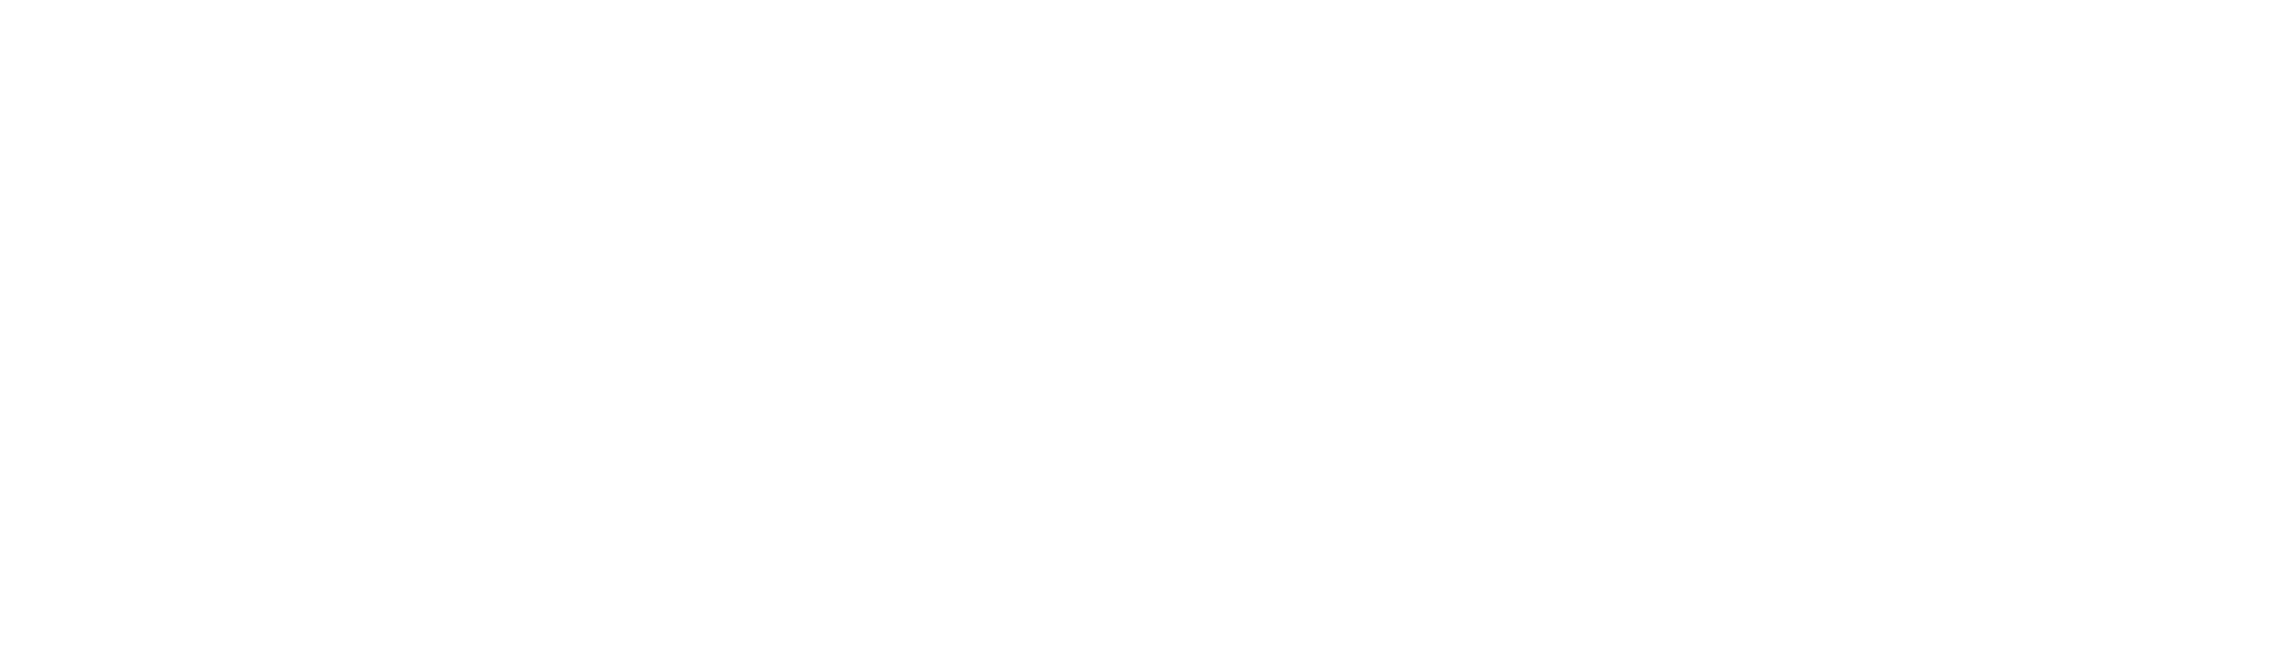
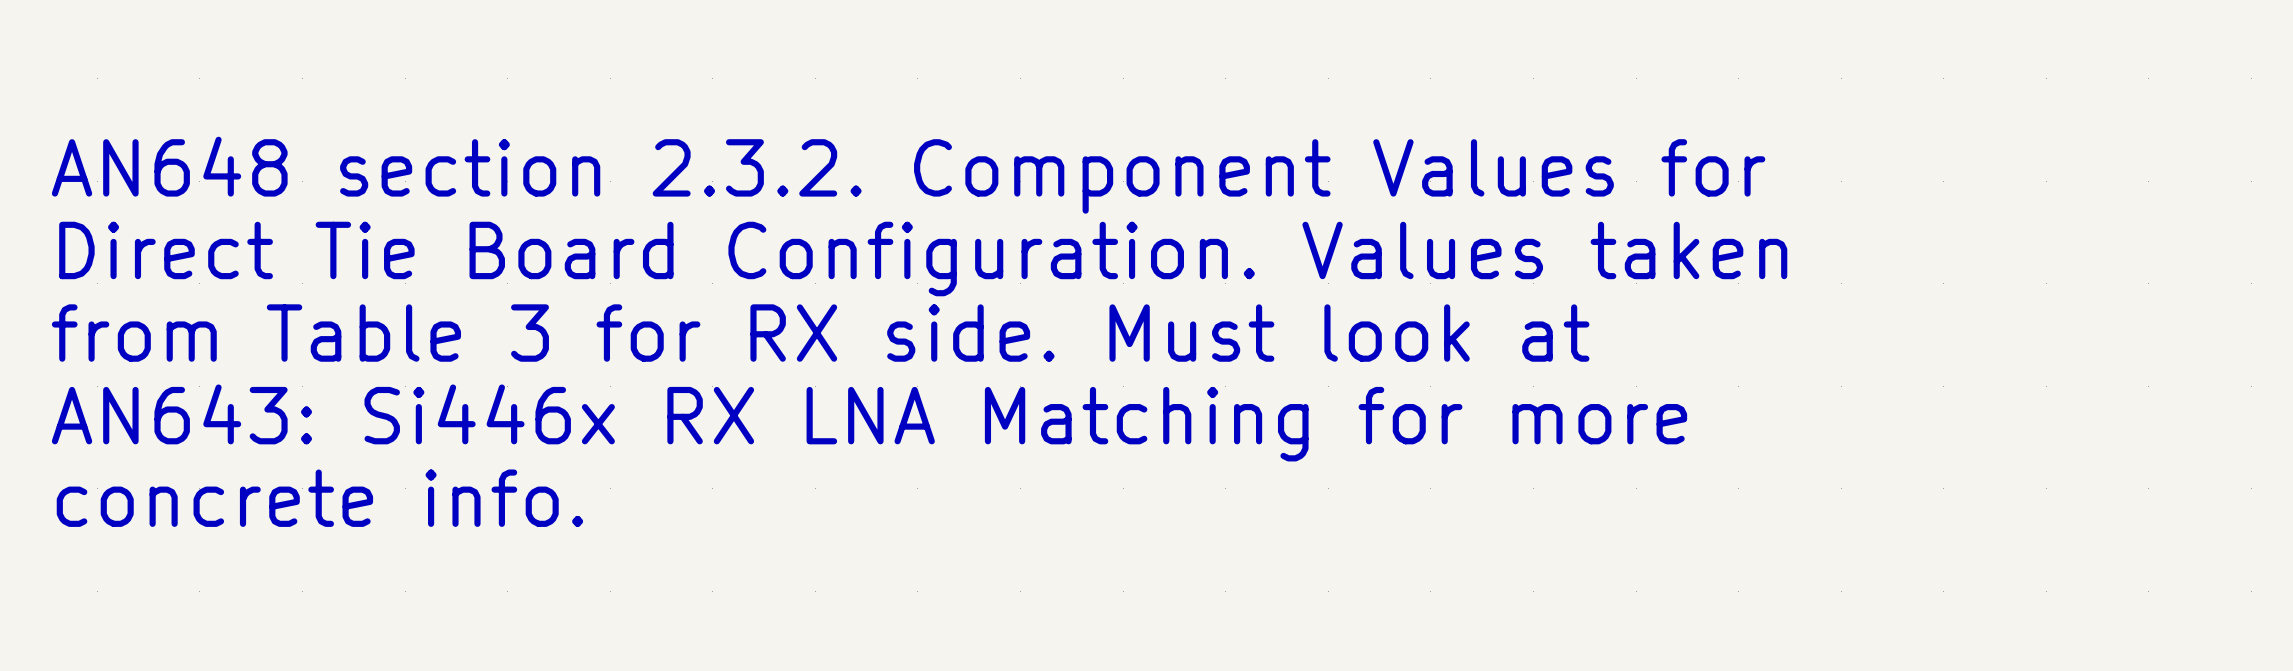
text: none -> AN648 section 2.3.2. Component Values for (908, 175)
text: none -> Direct Tie Board Configuration. Values taken (923, 259)
text: none -> from Table 3 for RX side. Must look at (820, 333)
text: none -> AN643: Si446x RX LNA Matching for more (869, 422)
text: none -> concrete info. (319, 498)

